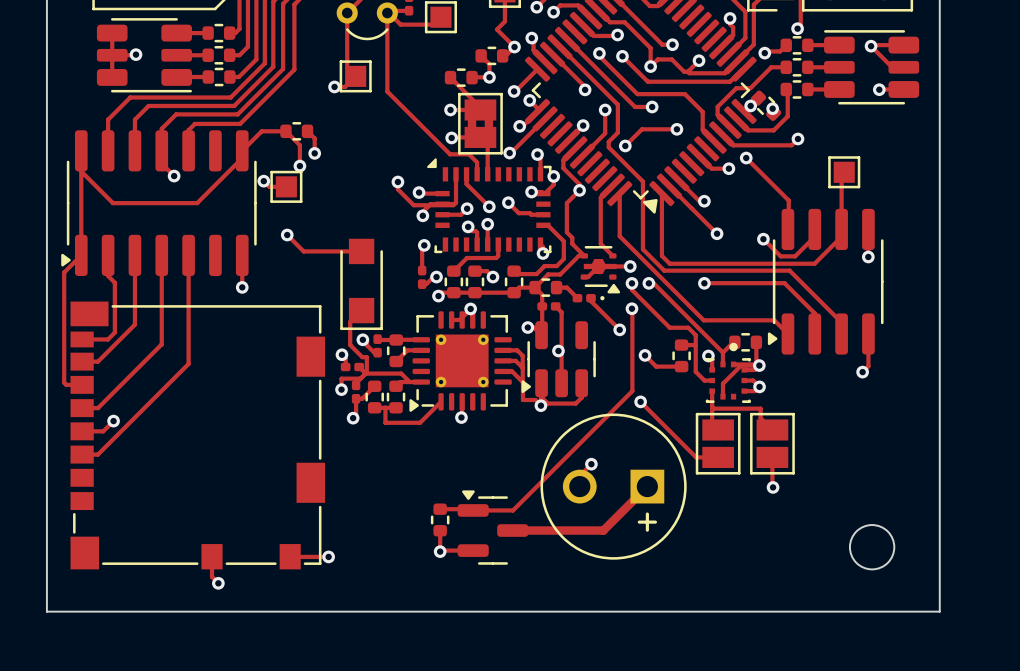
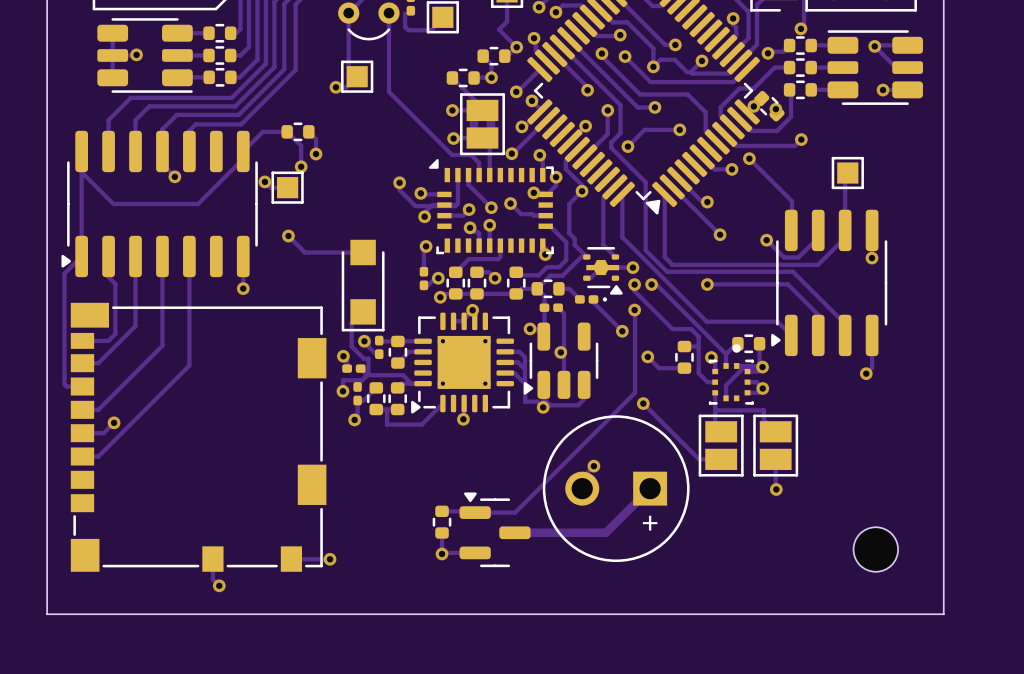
track: (409, 10) (394, 10) (394, 18) (400, 24) (433, 24) -> none
track: none -> (405, 13) (405, 27) (408, 30) (431, 30) (444, 17)

